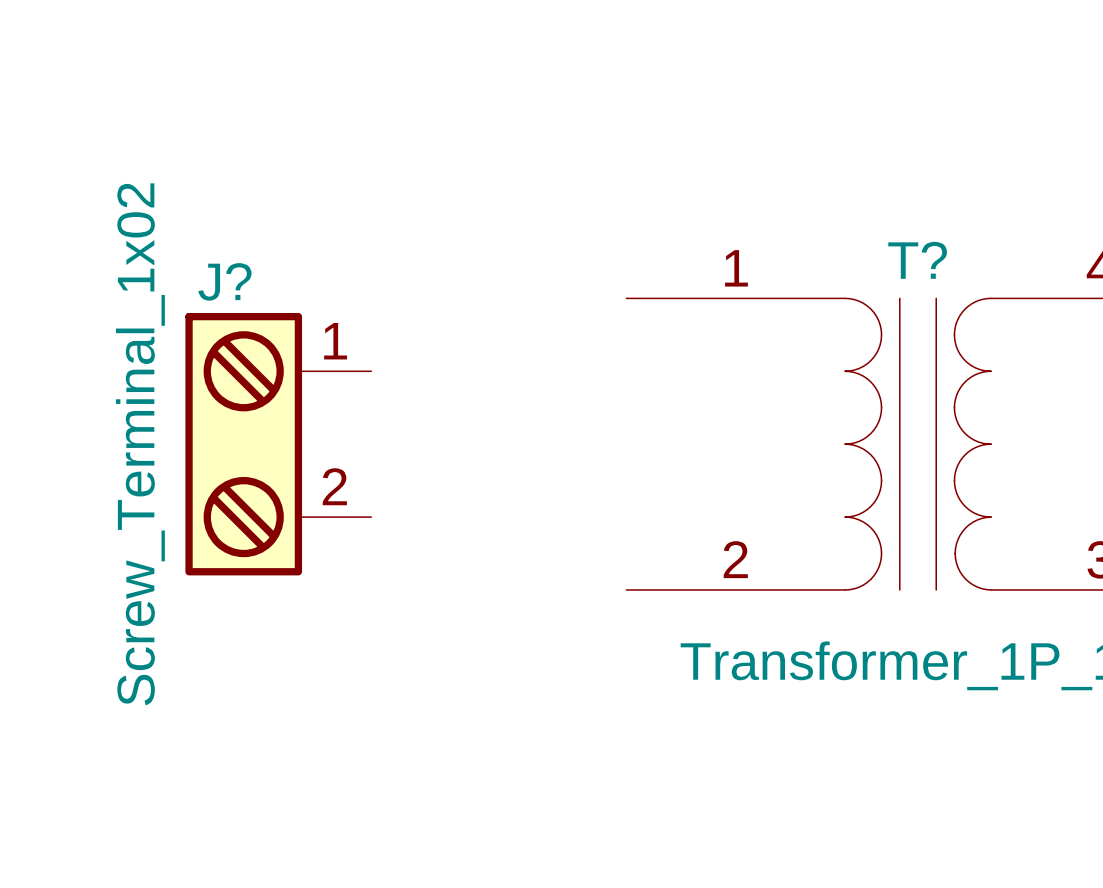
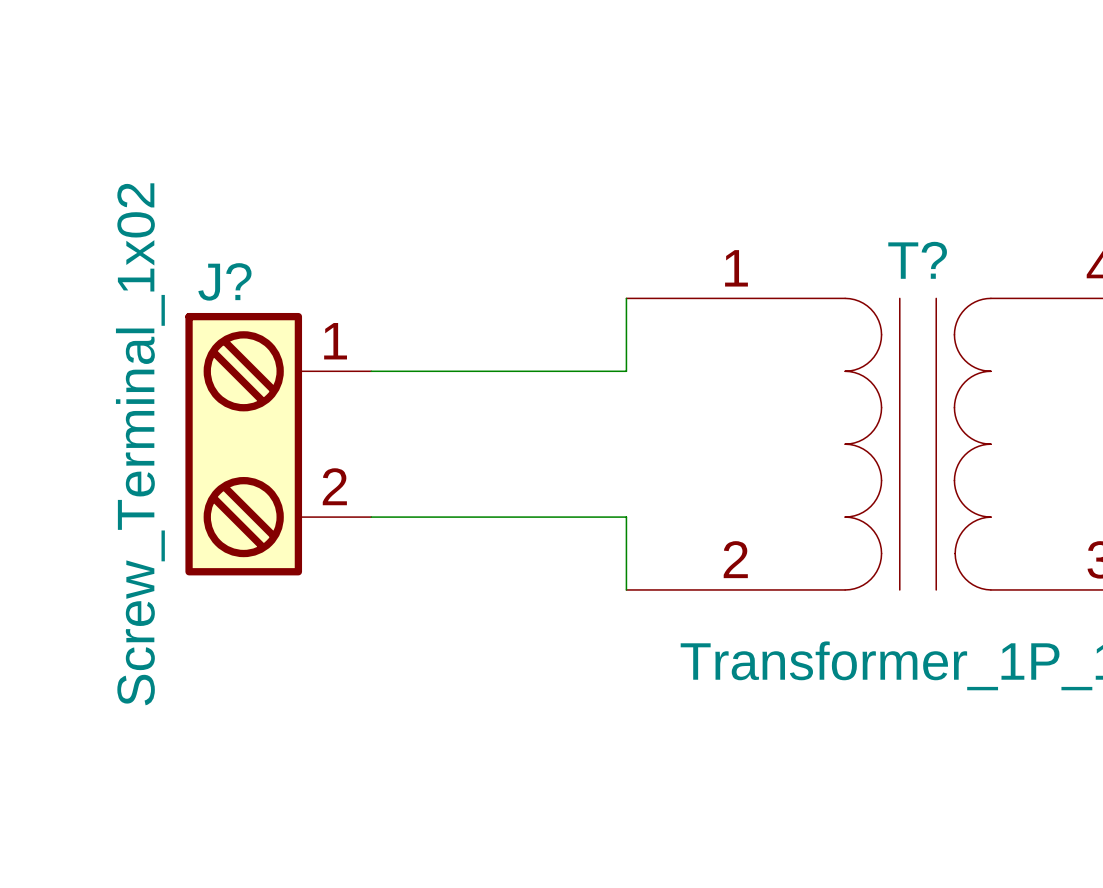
wire: none -> (626, 298) (626, 371) (371, 371)
wire: none -> (371, 517) (626, 517) (626, 589)

